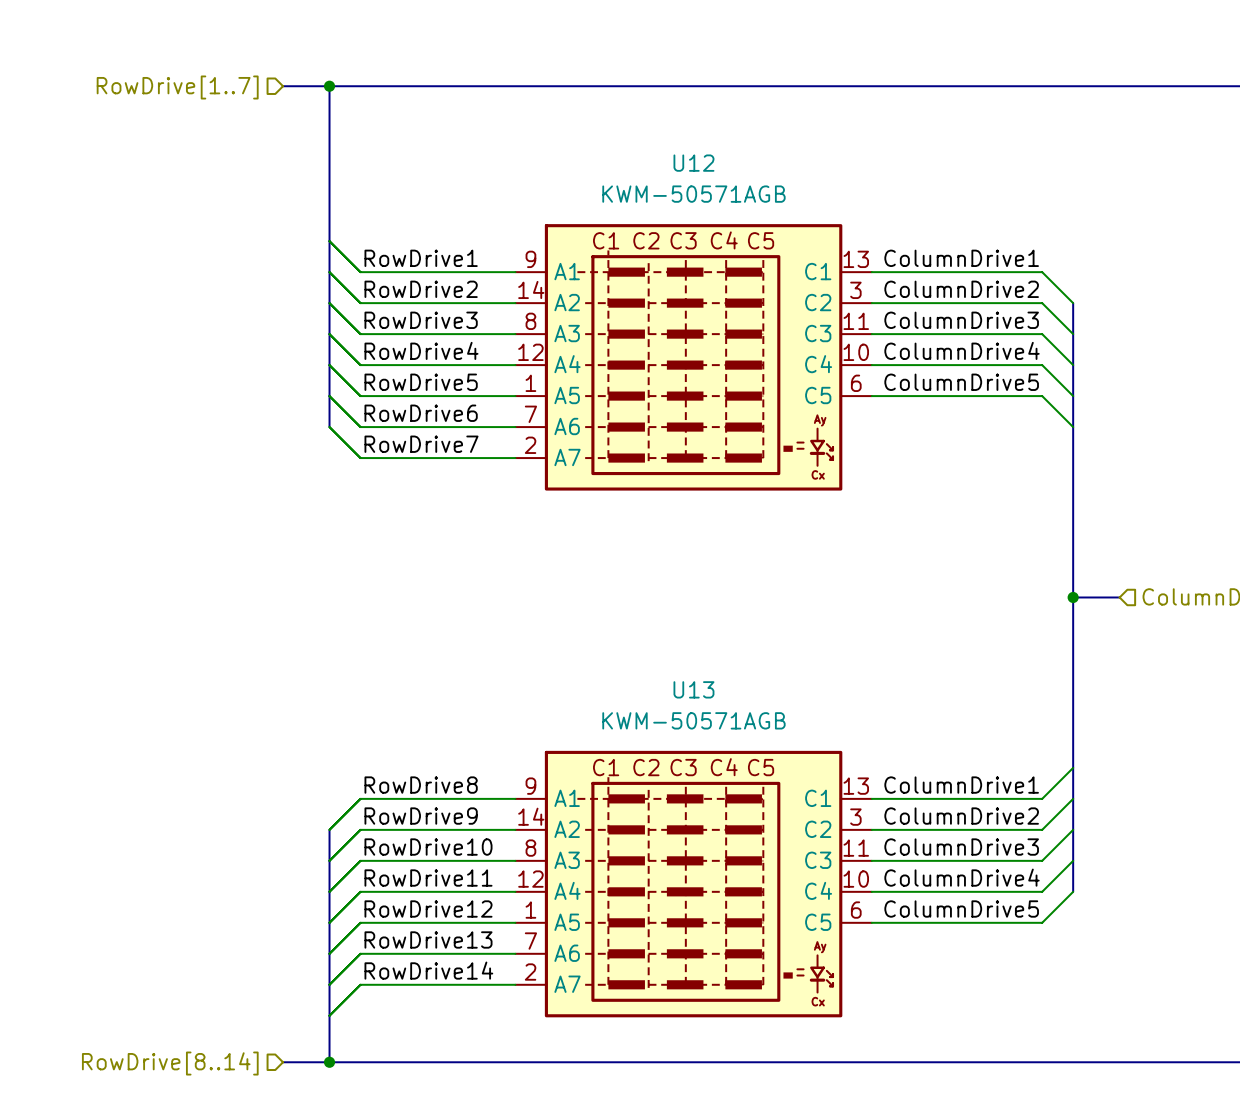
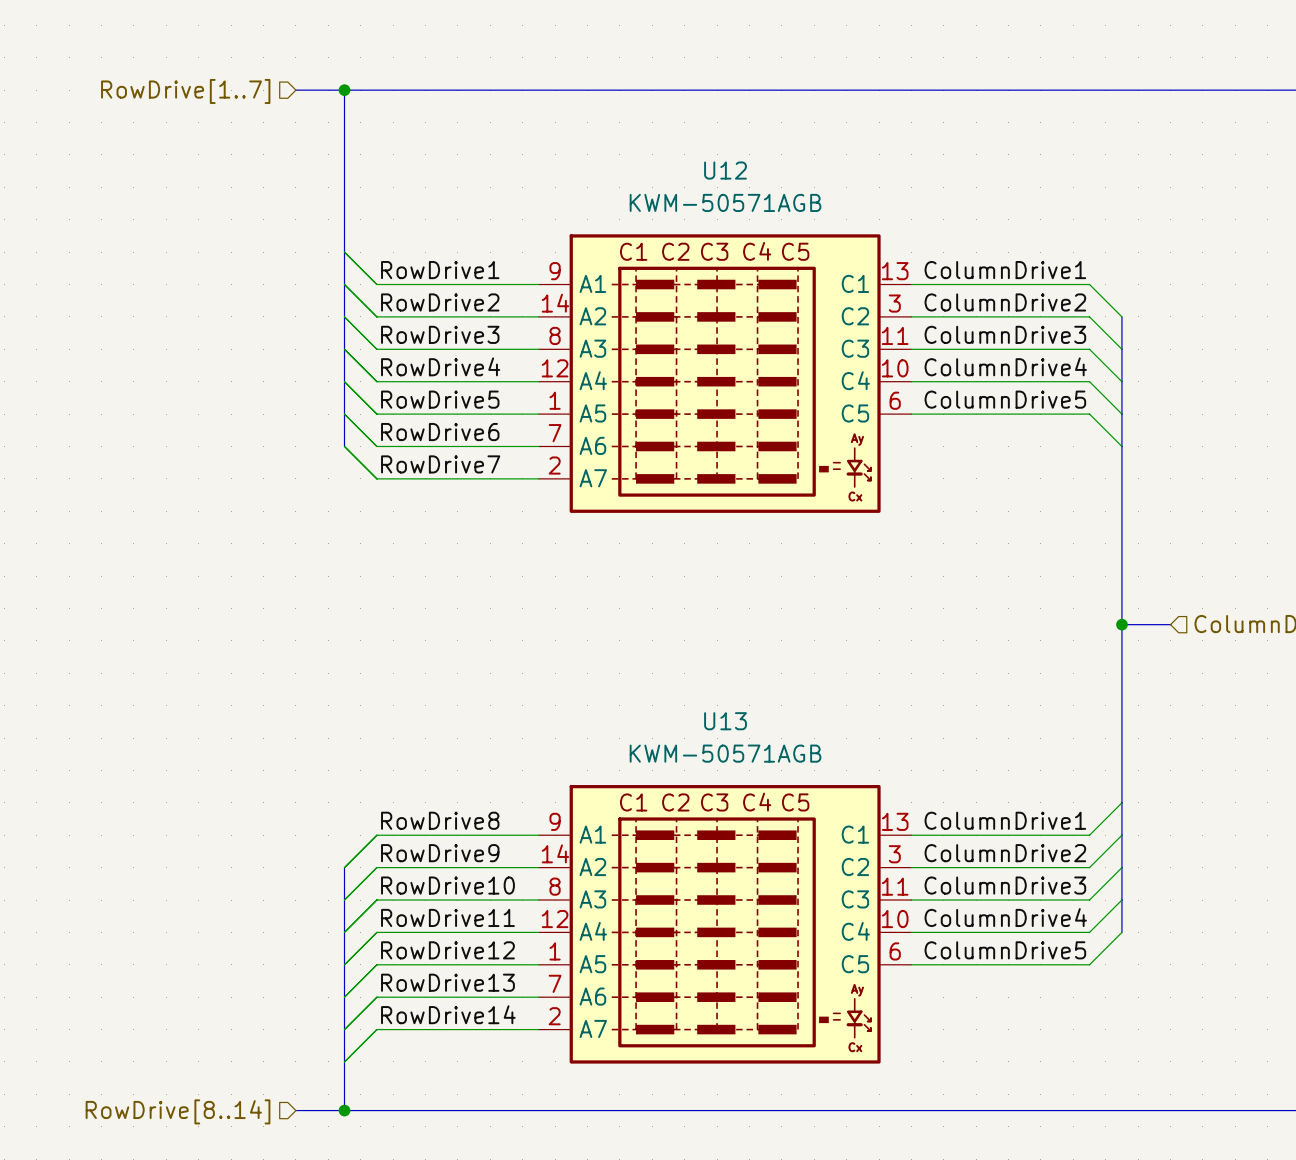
U12 symbol: [515, 224, 872, 491] -> [538, 234, 912, 513]
U13 symbol: [515, 750, 872, 1018] -> [538, 785, 912, 1064]

